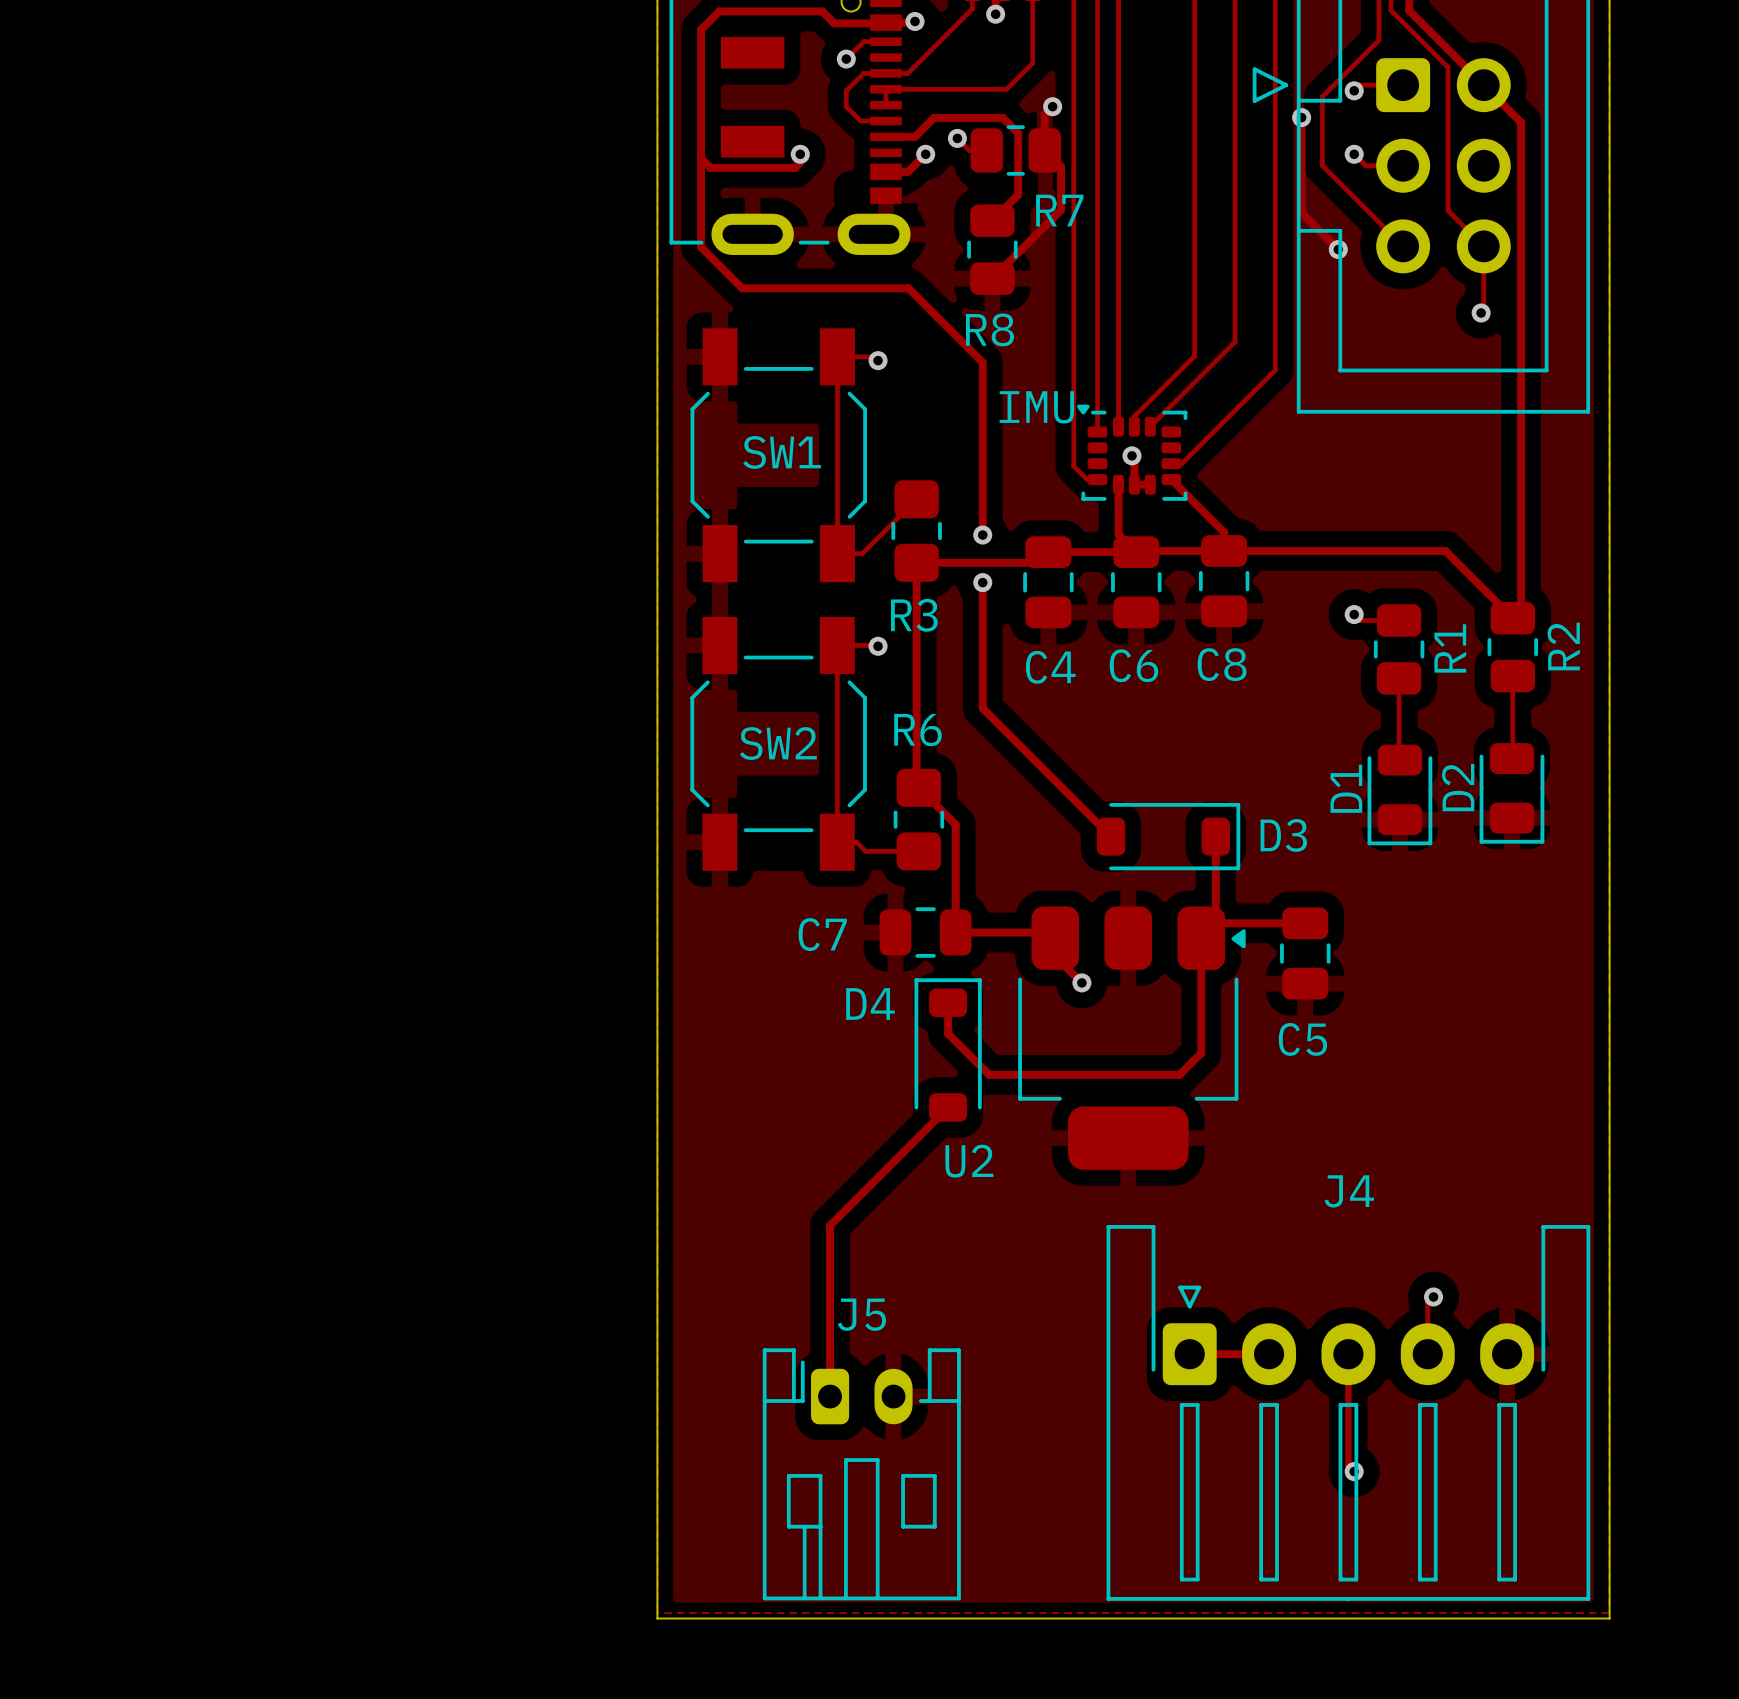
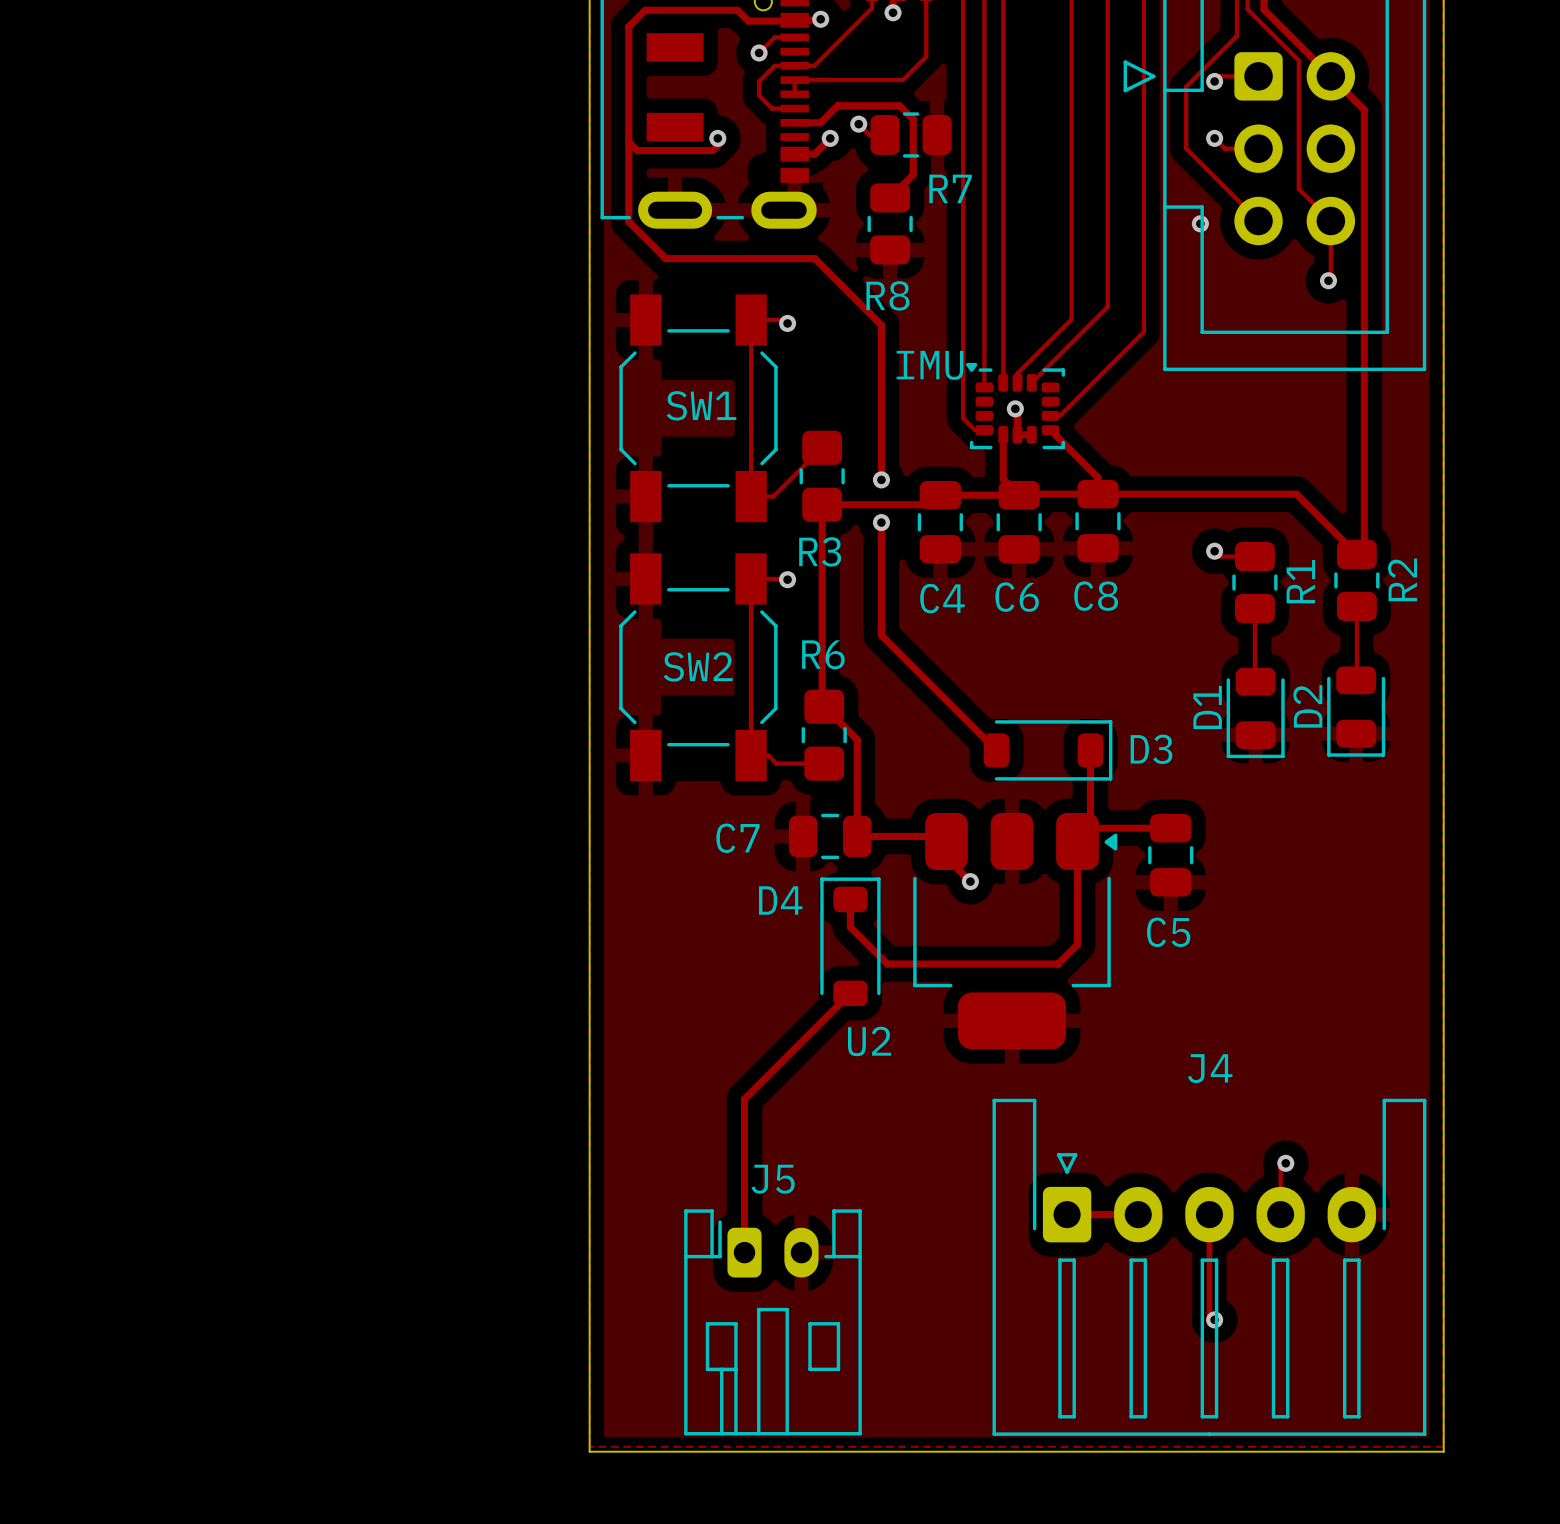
track: (1052, 106) (1044, 114) (1044, 150) (1061, 166) (1061, 209) (992, 278) -> none
via: (1052, 106) -> none
track: (1301, 117) (1301, 212) (1338, 249) -> none
via: (1301, 117) -> none

